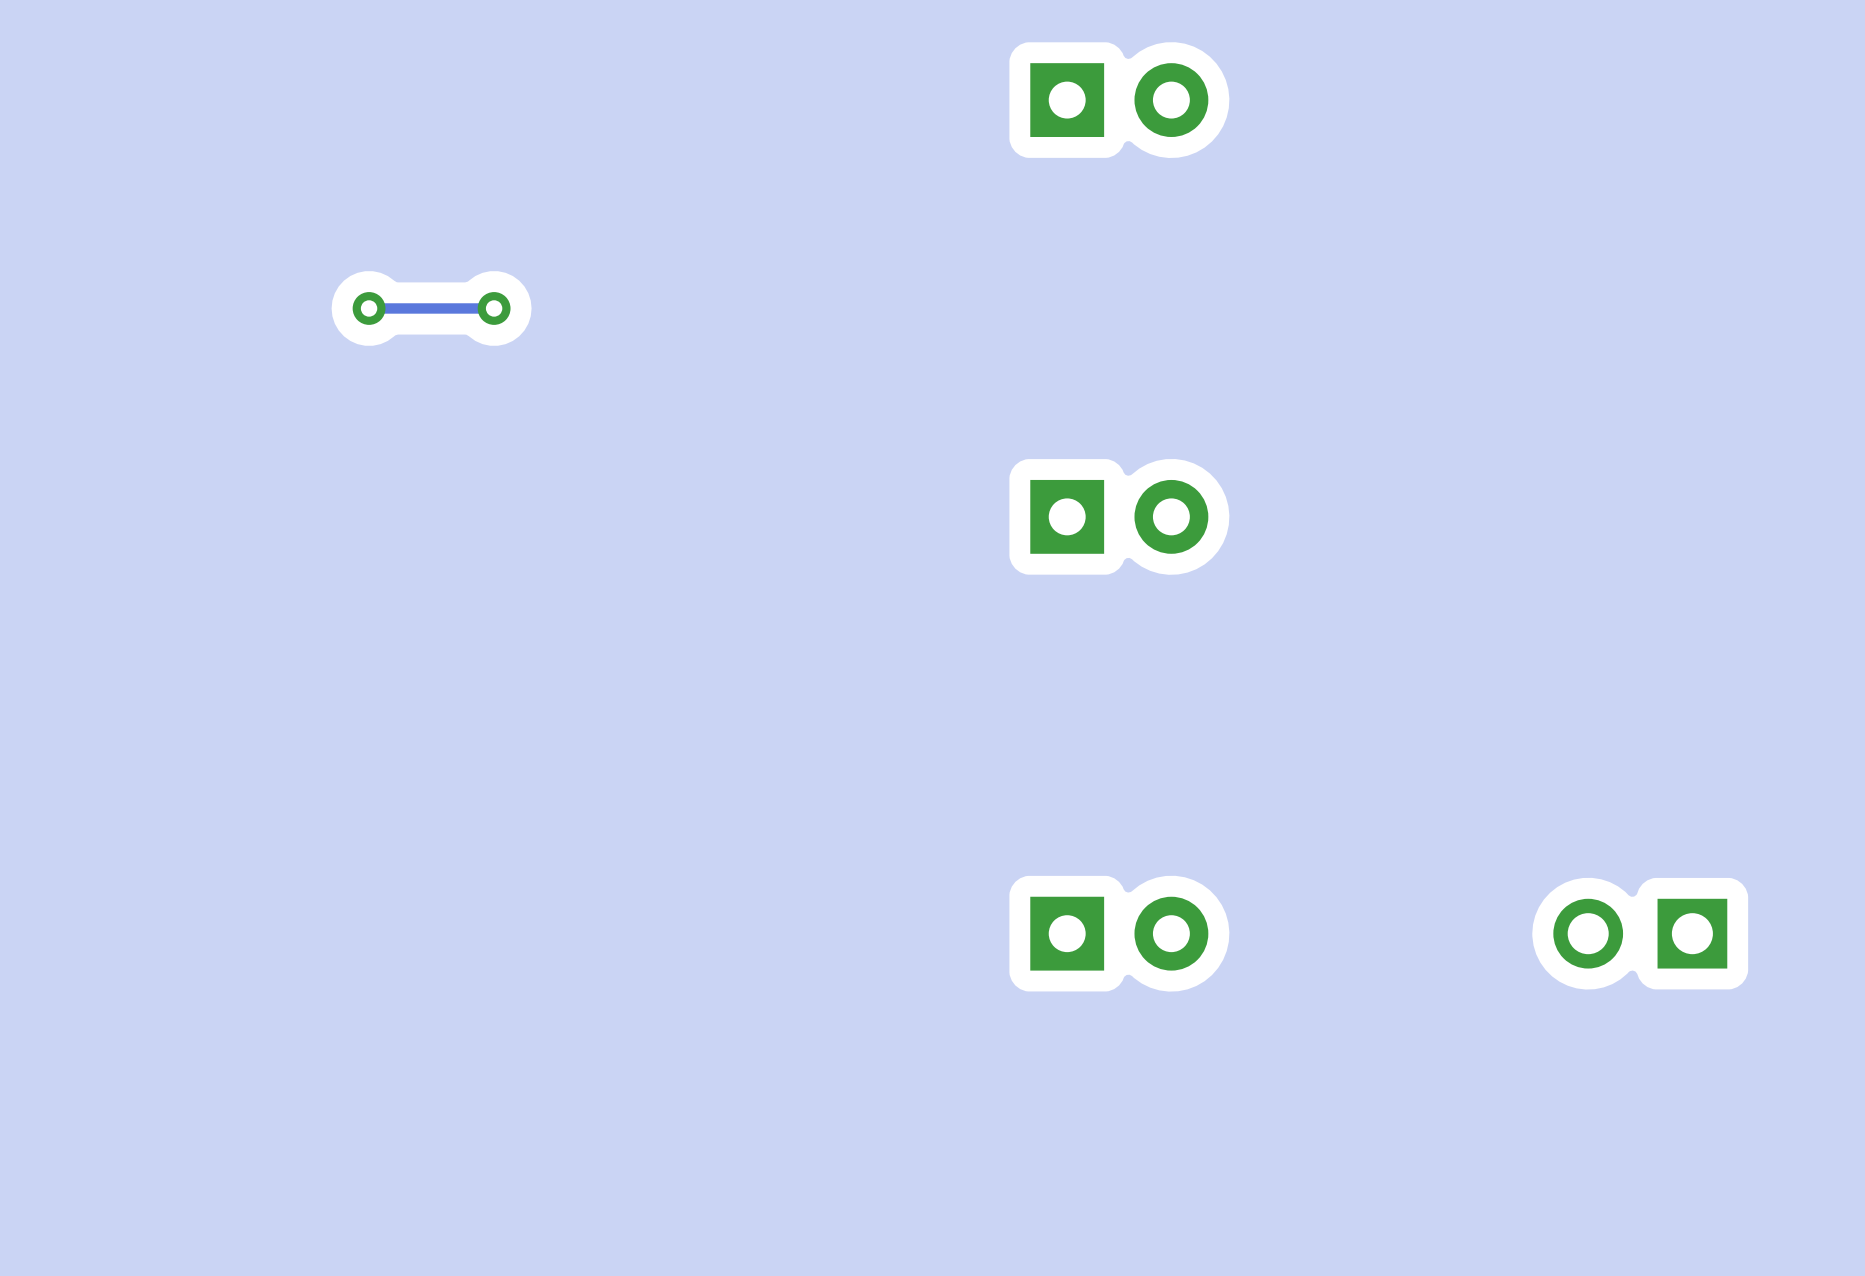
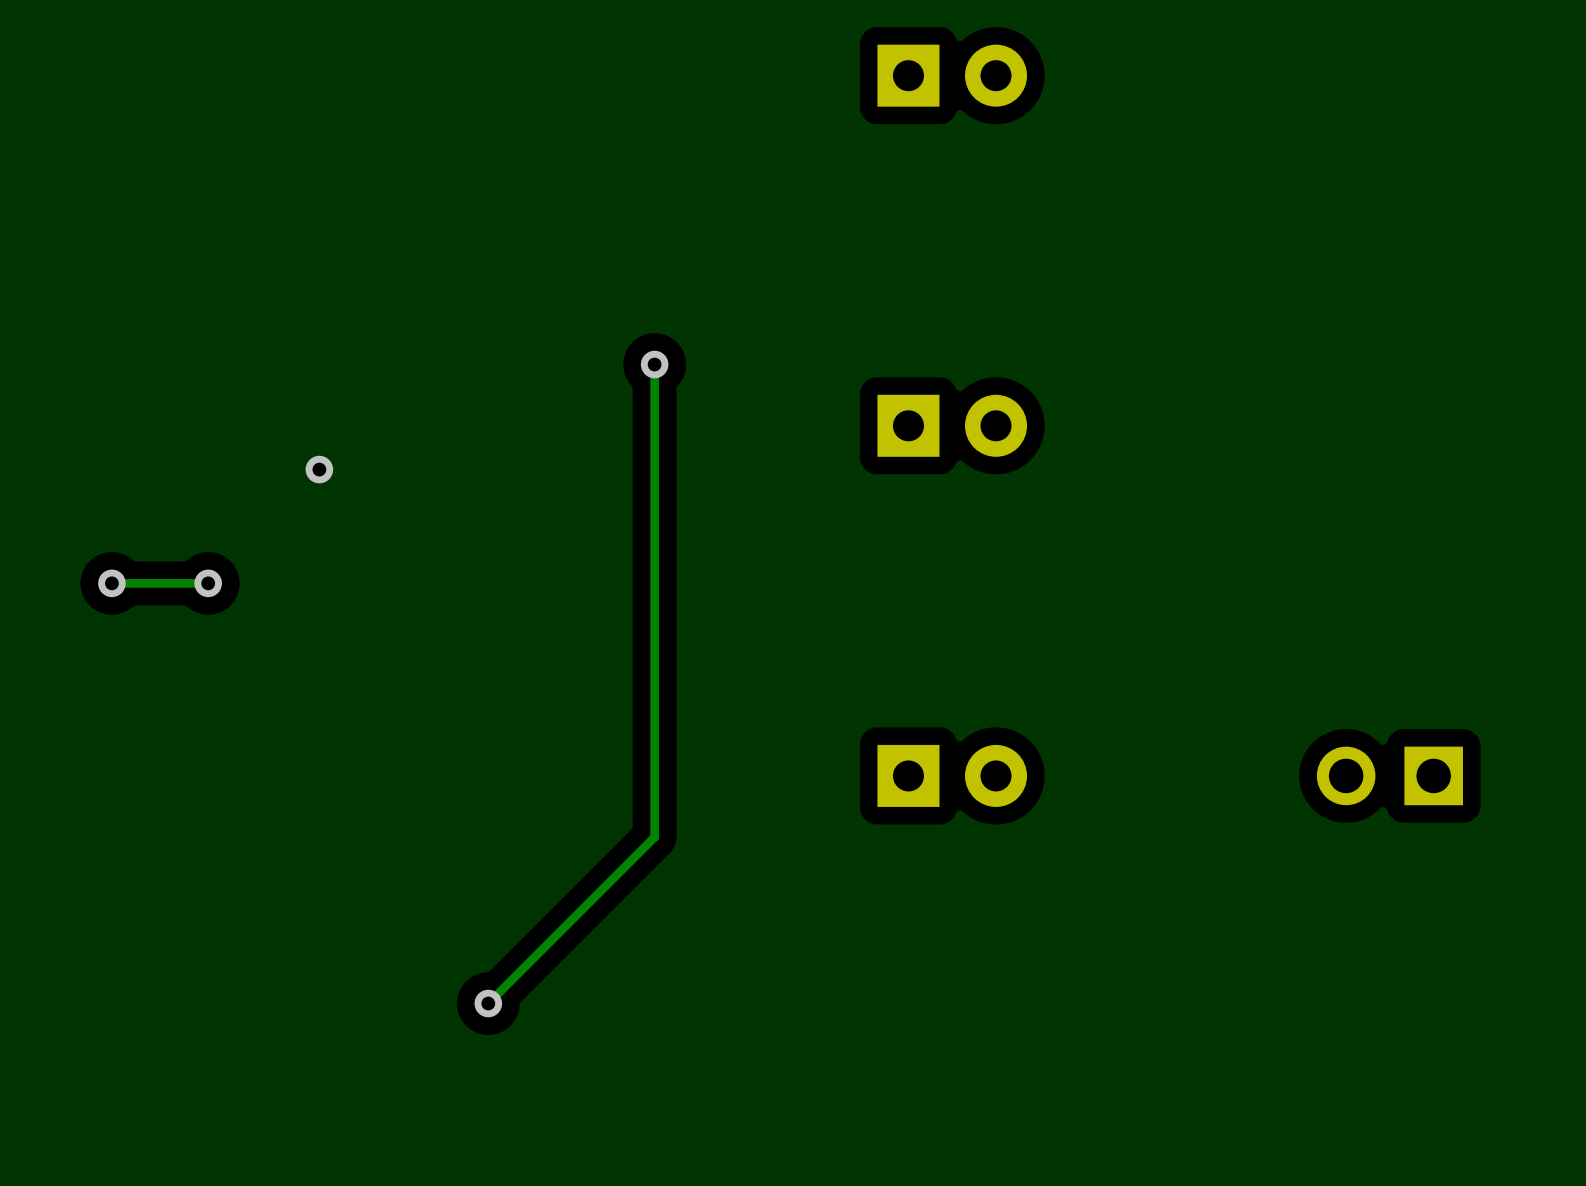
via: (369, 308) -> none
track: (494, 308) (369, 308) -> none
via: (494, 308) -> none
track: none -> (654, 364) (654, 837) (488, 1003)
via: none -> (654, 364)
via: none -> (319, 469)
via: none -> (111, 583)
track: none -> (208, 583) (111, 583)
via: none -> (208, 583)
via: none -> (488, 1003)

